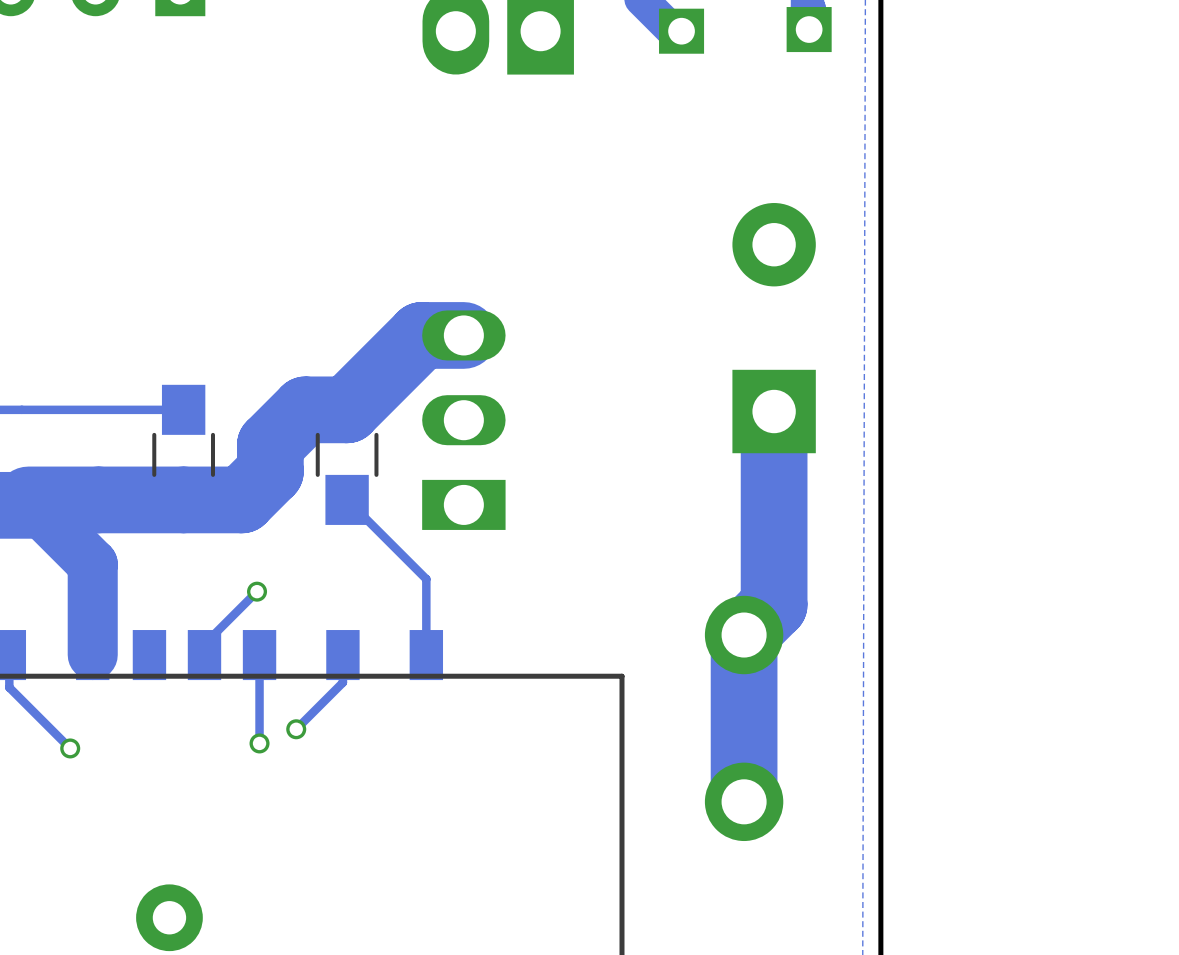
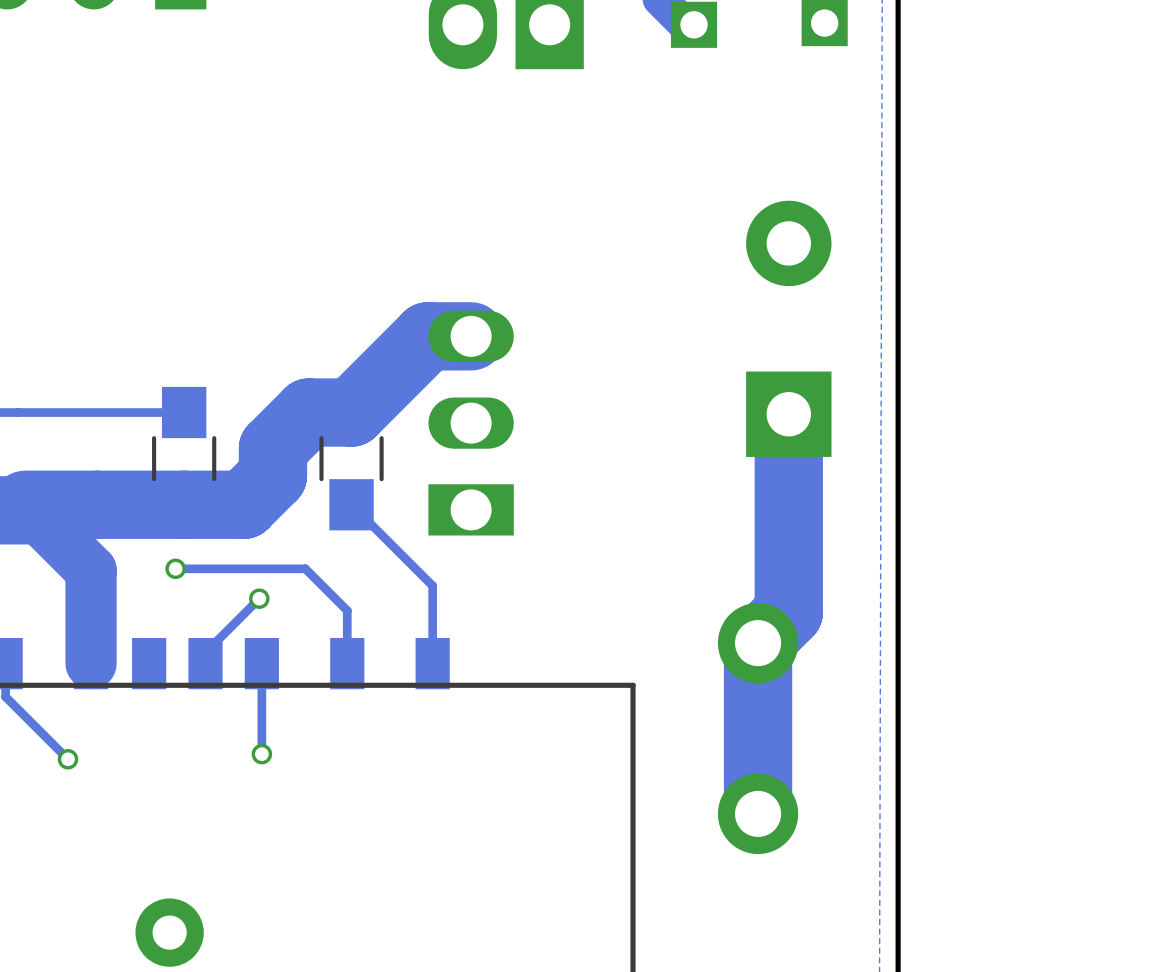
track: none -> (175, 568) (305, 568) (347, 610) (347, 652)
via: none -> (175, 568)
track: (342, 655) (342, 682) (296, 729) -> none
via: (296, 729) -> none

